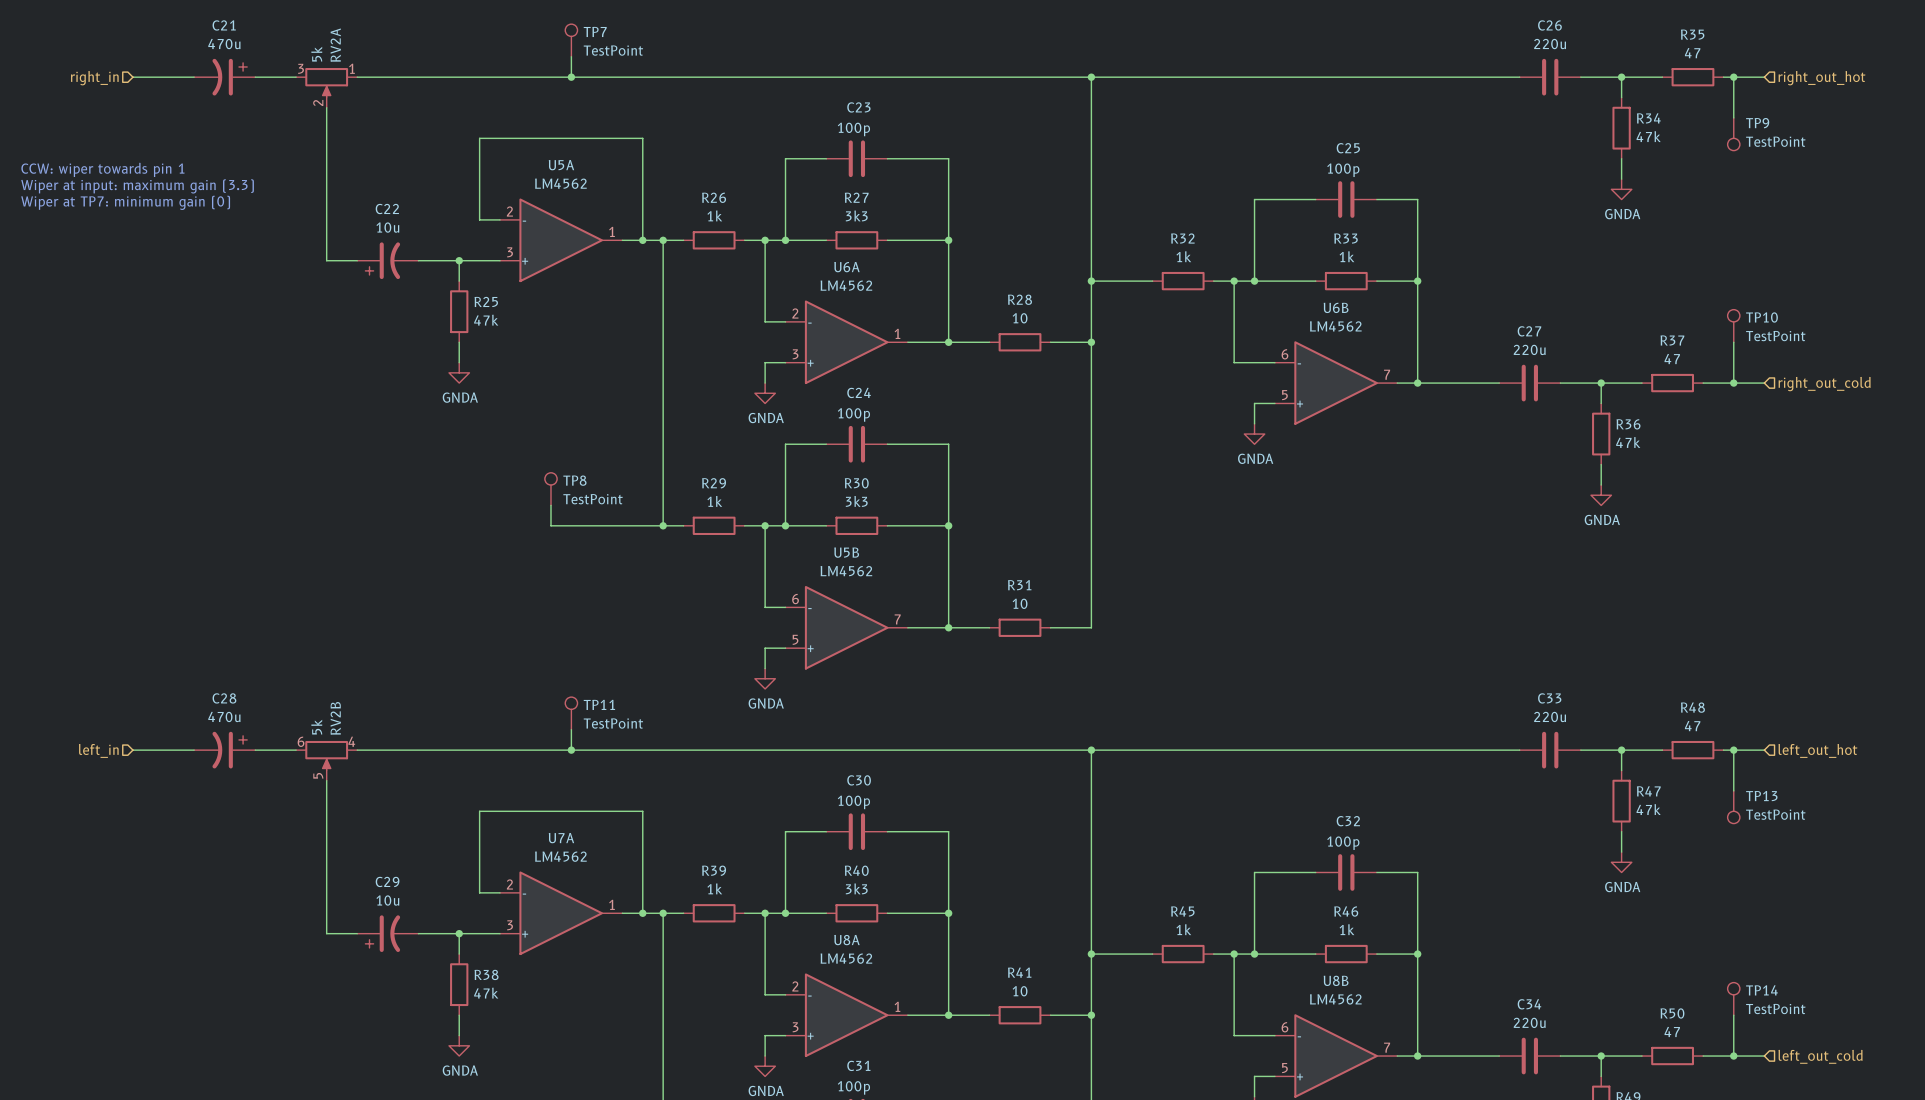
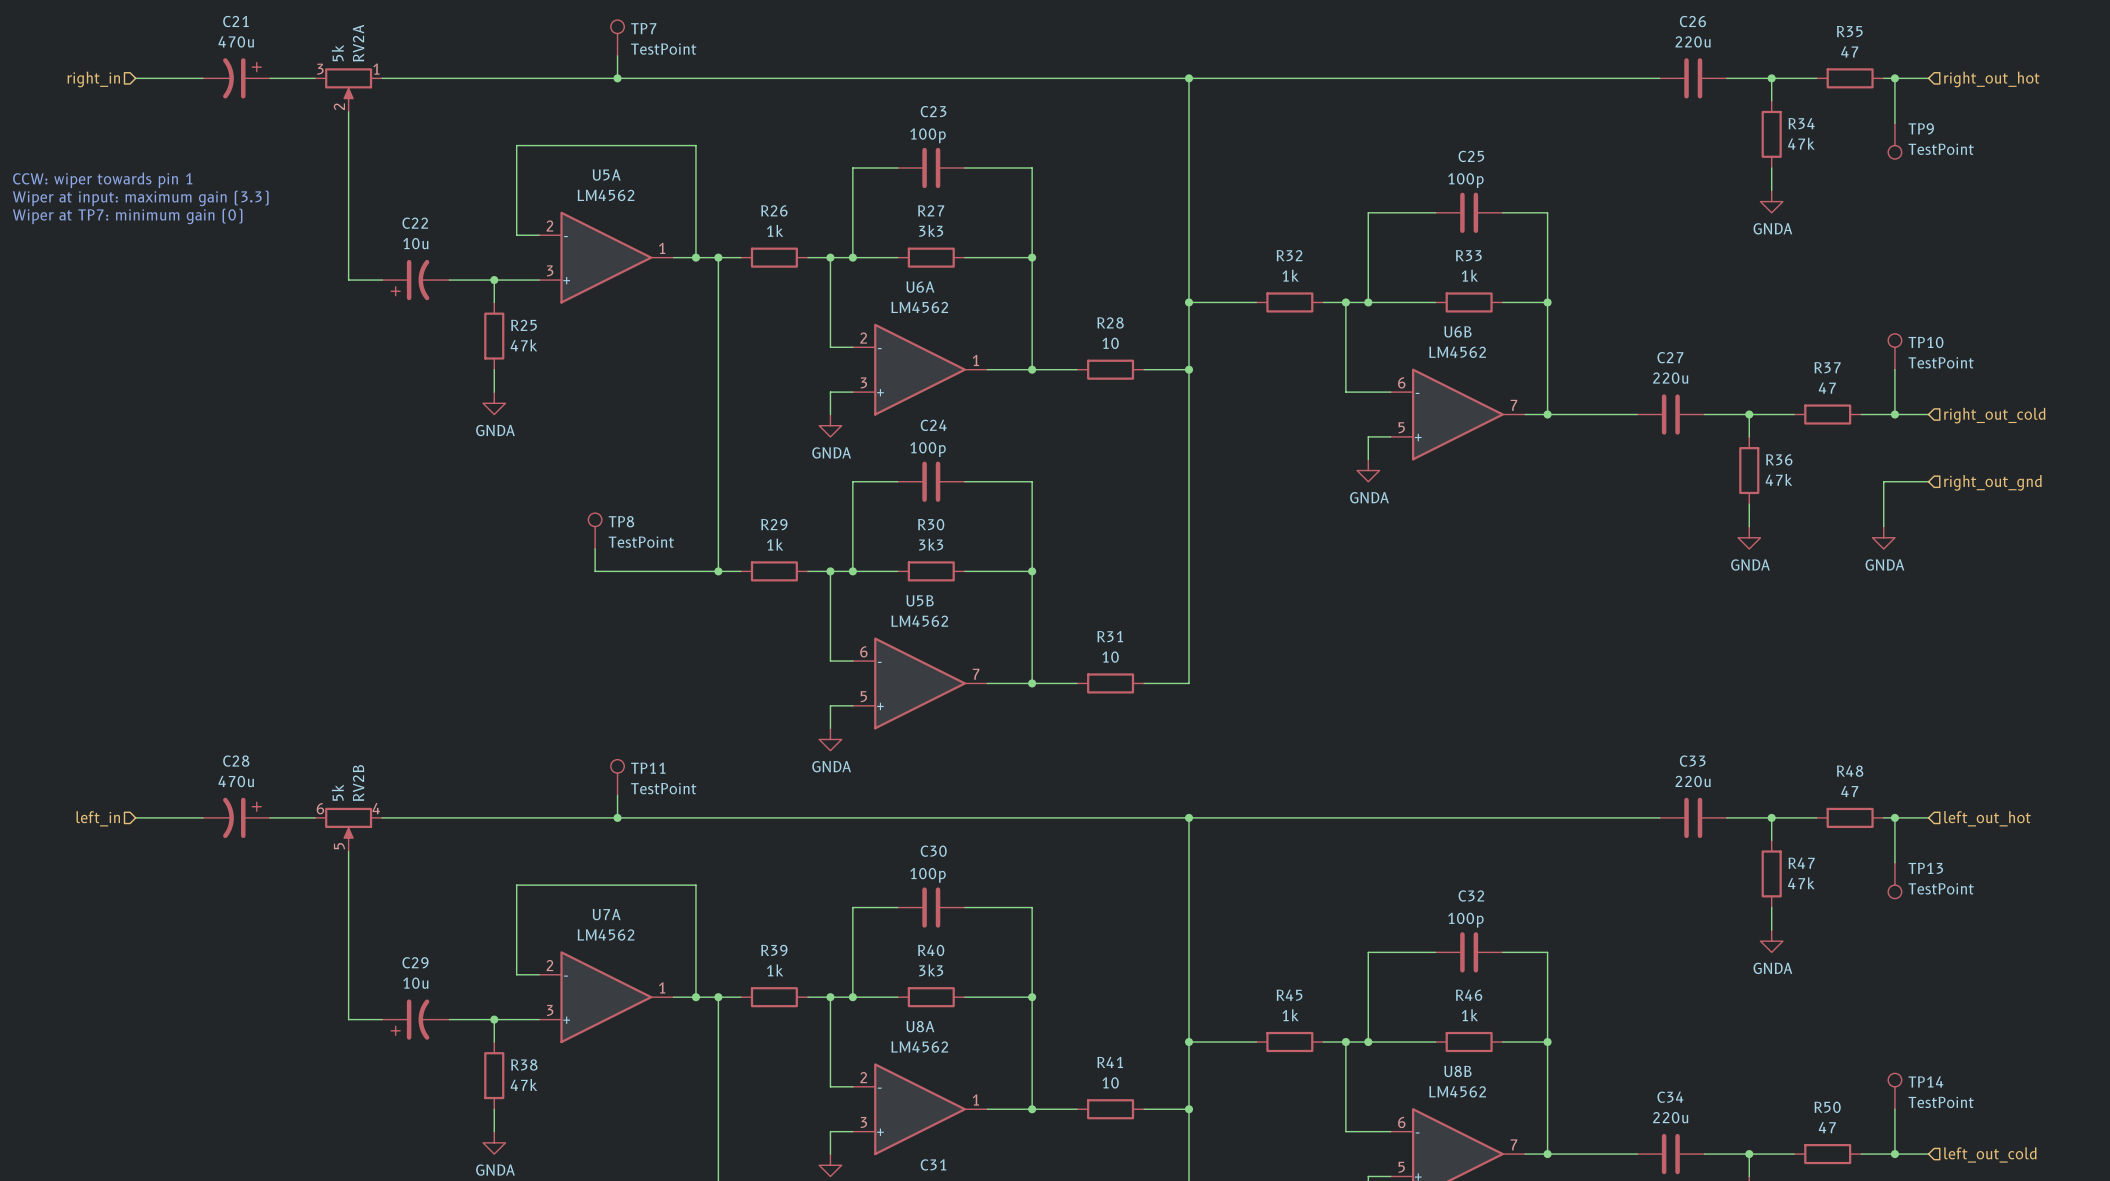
wire: none -> (1928, 481) (1883, 481) (1883, 526)
hierarchical label: none -> right_out_gnd (1993, 482)
power symbol: none -> GNDA (1883, 537)

